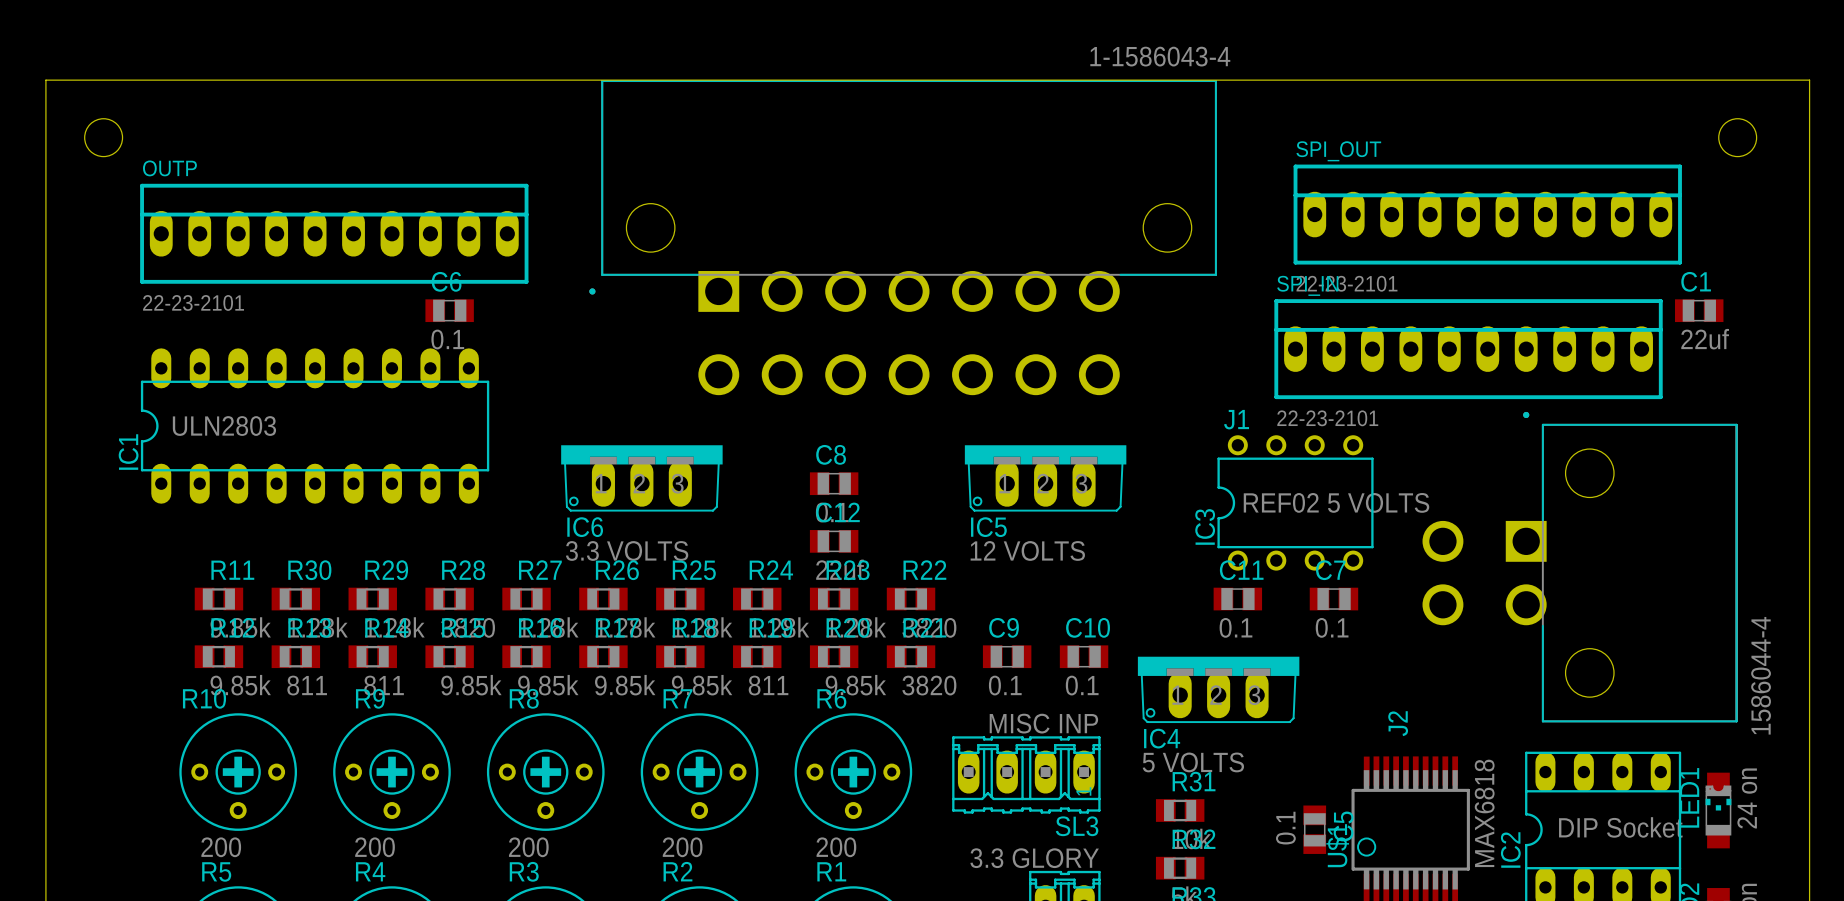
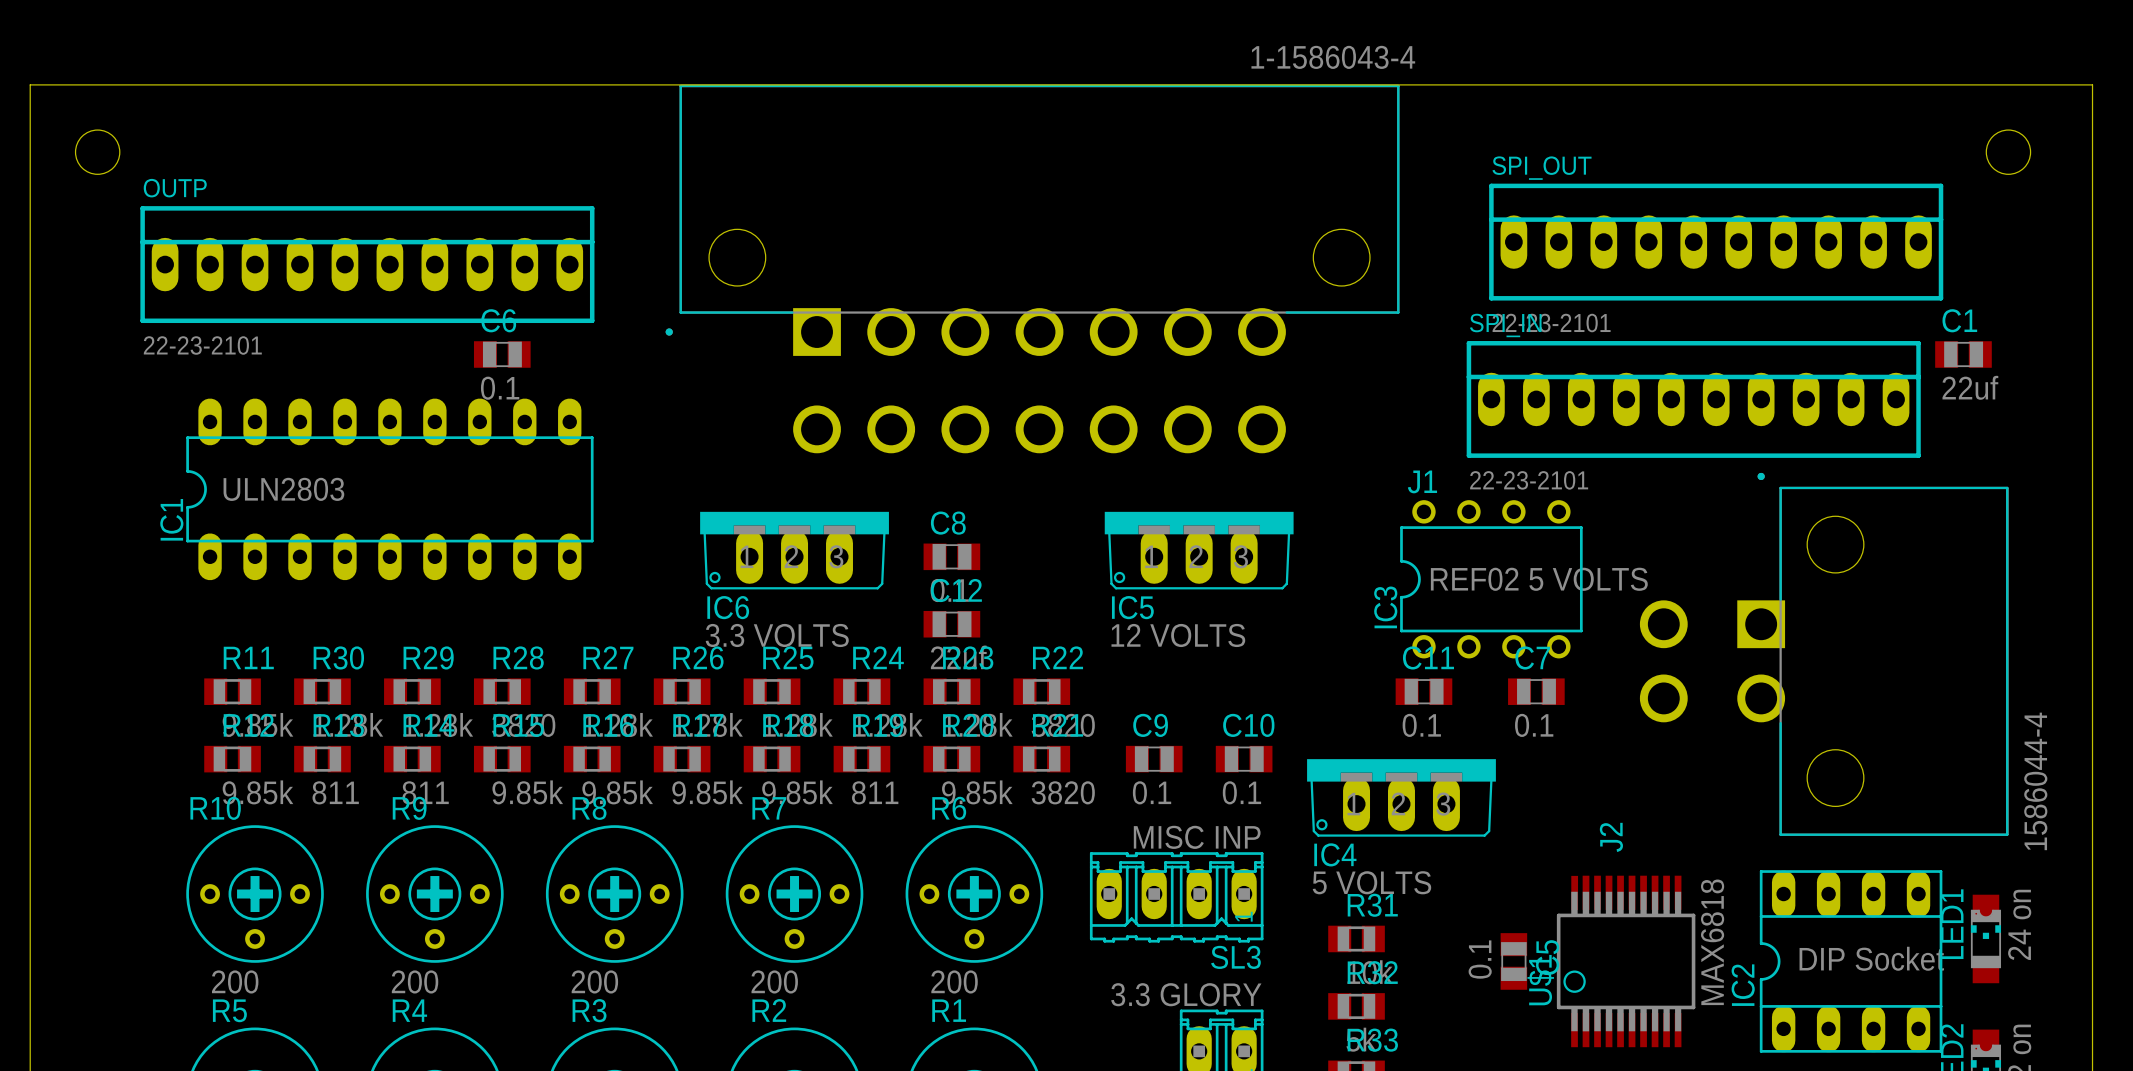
IC1 position: (315, 426) -> (389, 489)
IC6 position: (641, 478) -> (794, 550)

